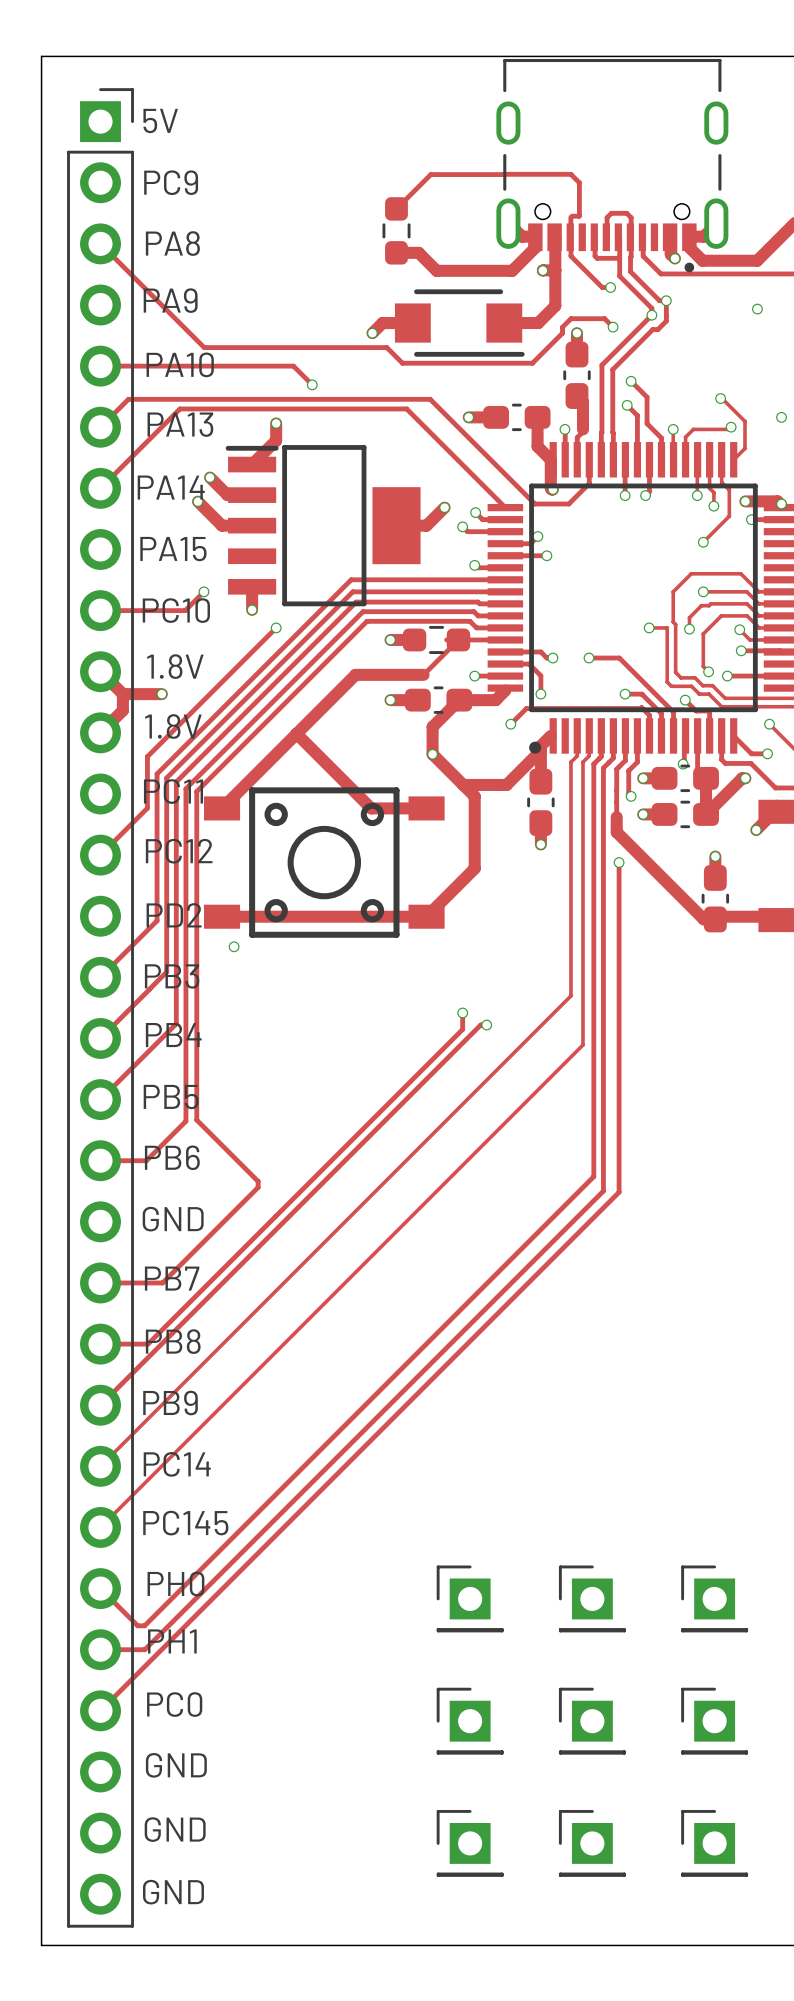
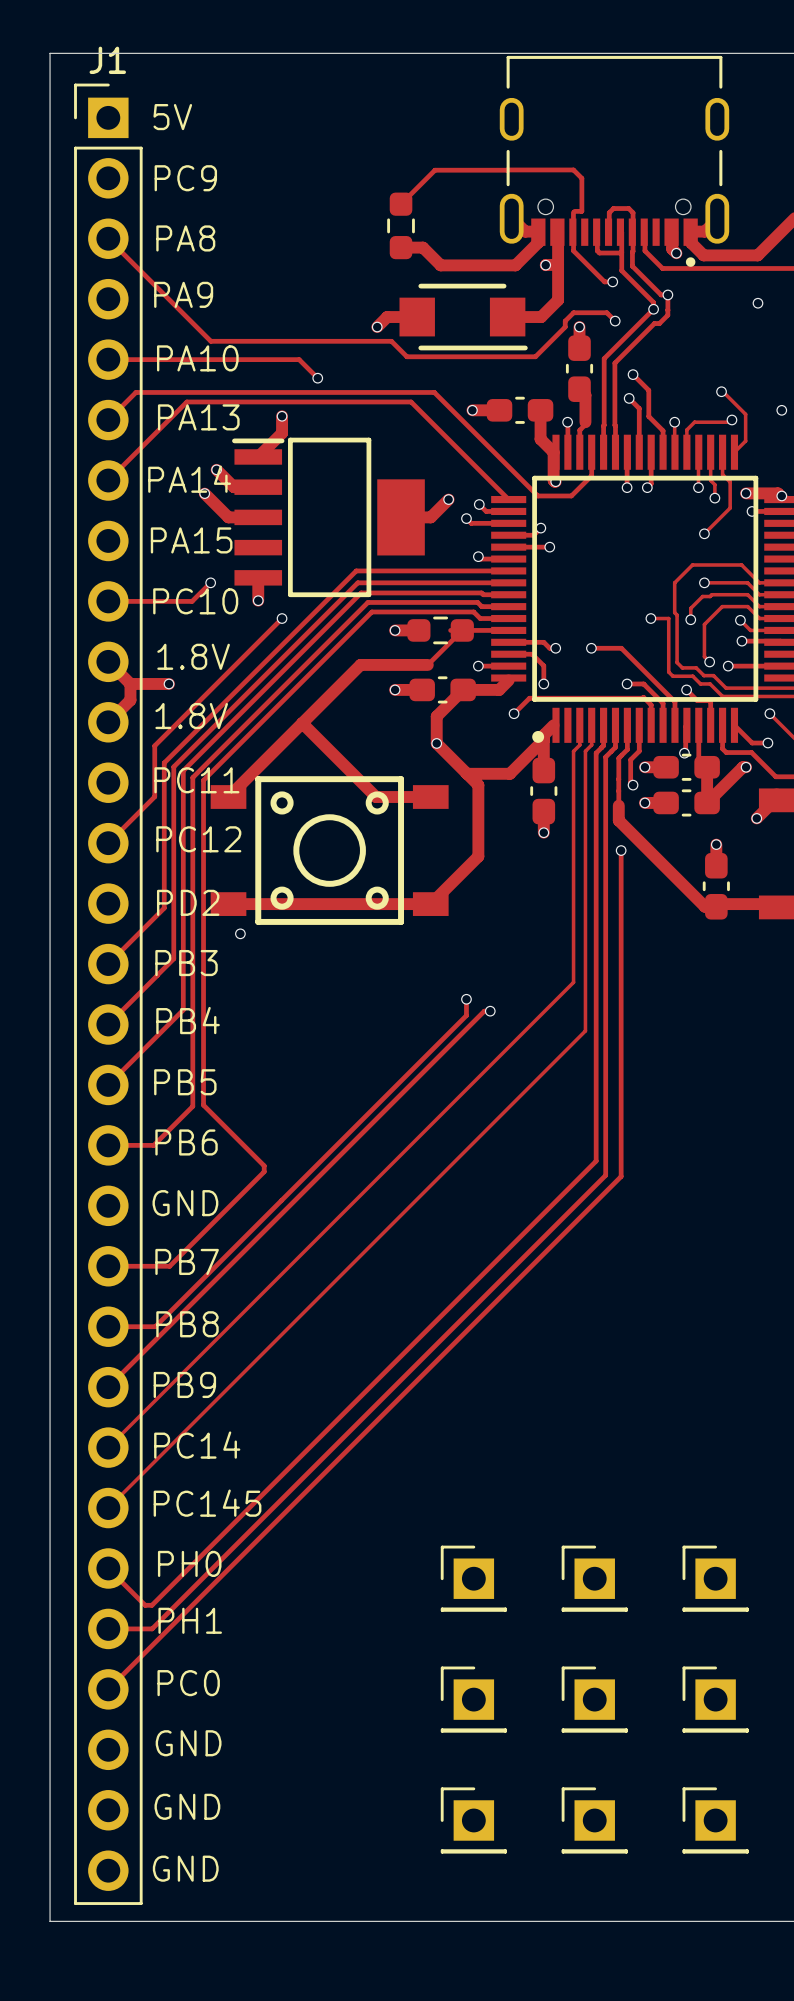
part: (100, 1007) -> none
J1: none -> (108, 994)

